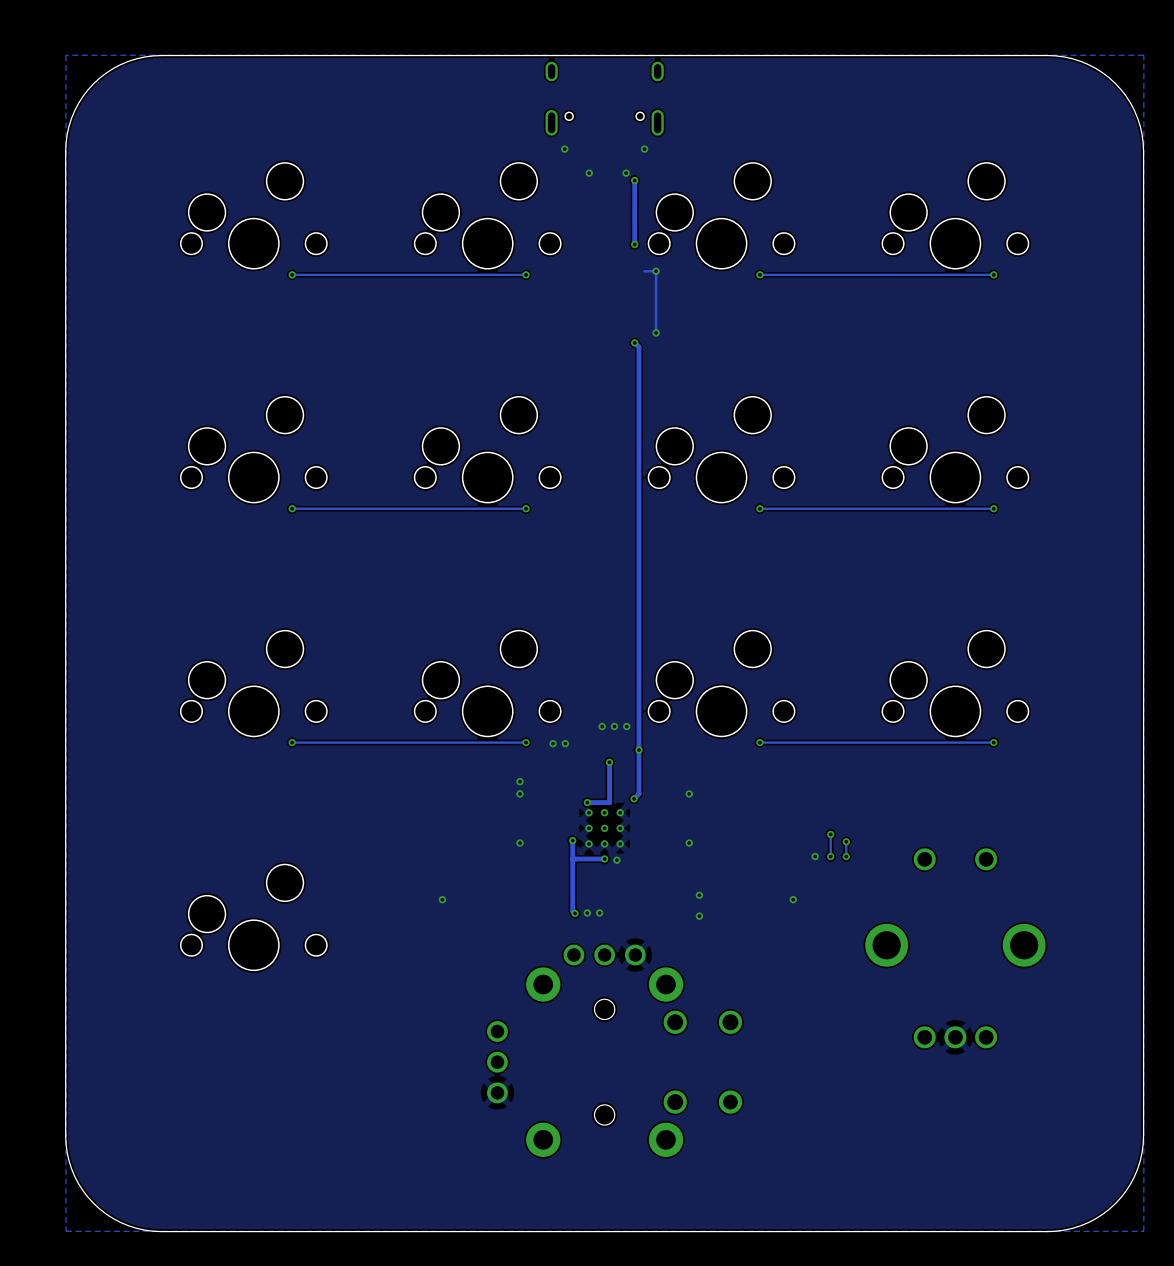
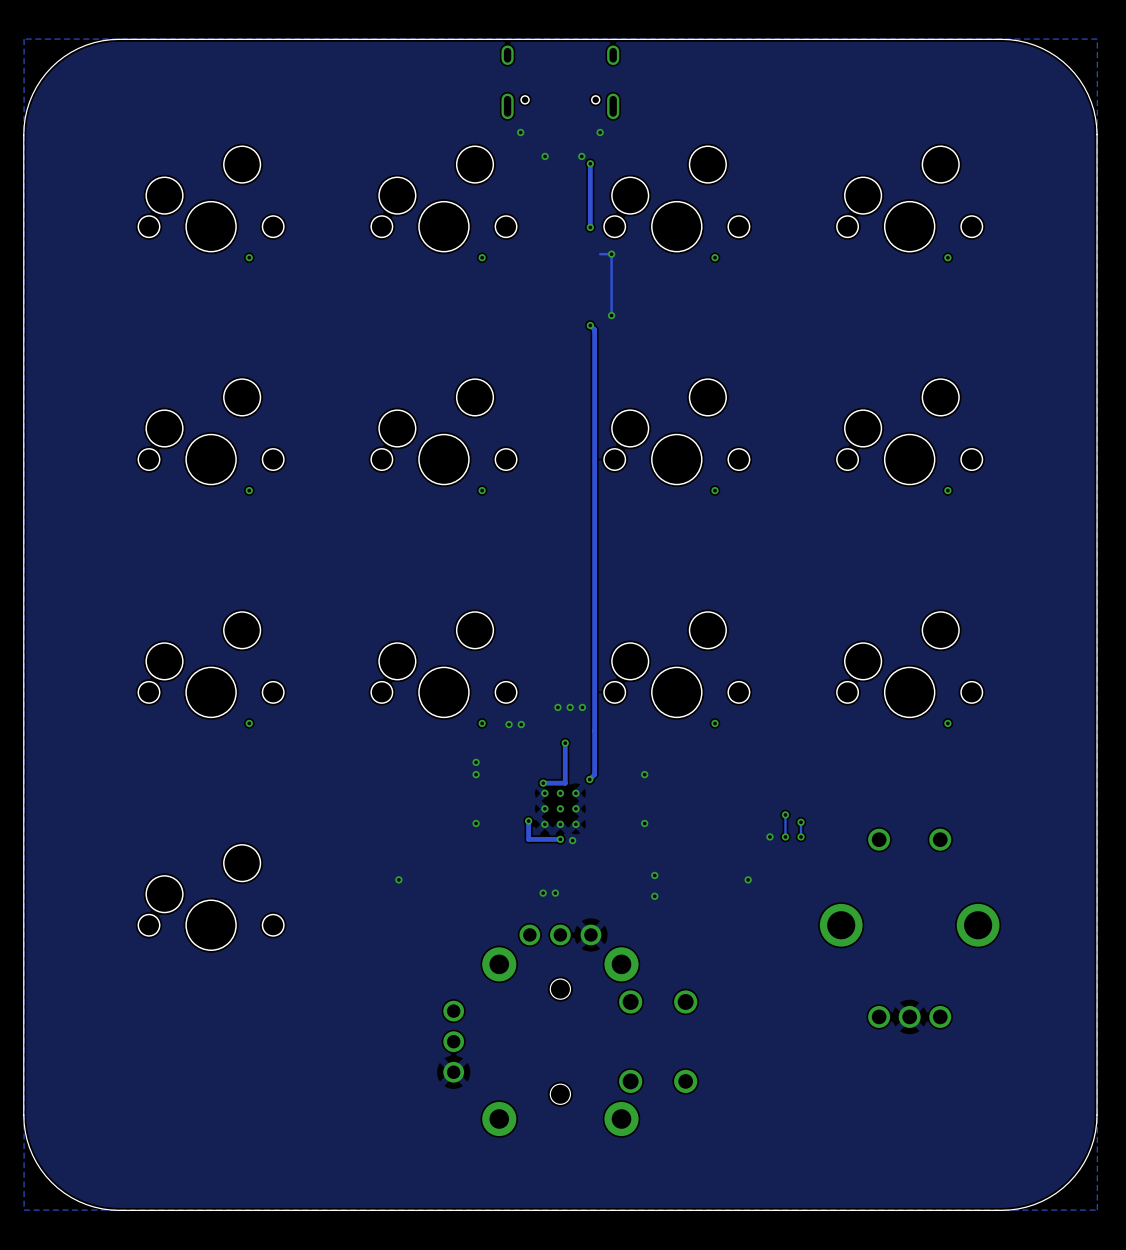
track: (526, 274) (292, 274) -> none
track: (993, 274) (759, 274) -> none
track: (526, 508) (292, 508) -> none
track: (993, 508) (759, 508) -> none
track: (526, 742) (292, 742) -> none
track: (993, 742) (759, 742) -> none
via: (639, 750) -> none
track: (572, 859) (572, 911) (575, 913) -> none
via: (575, 913) -> none

